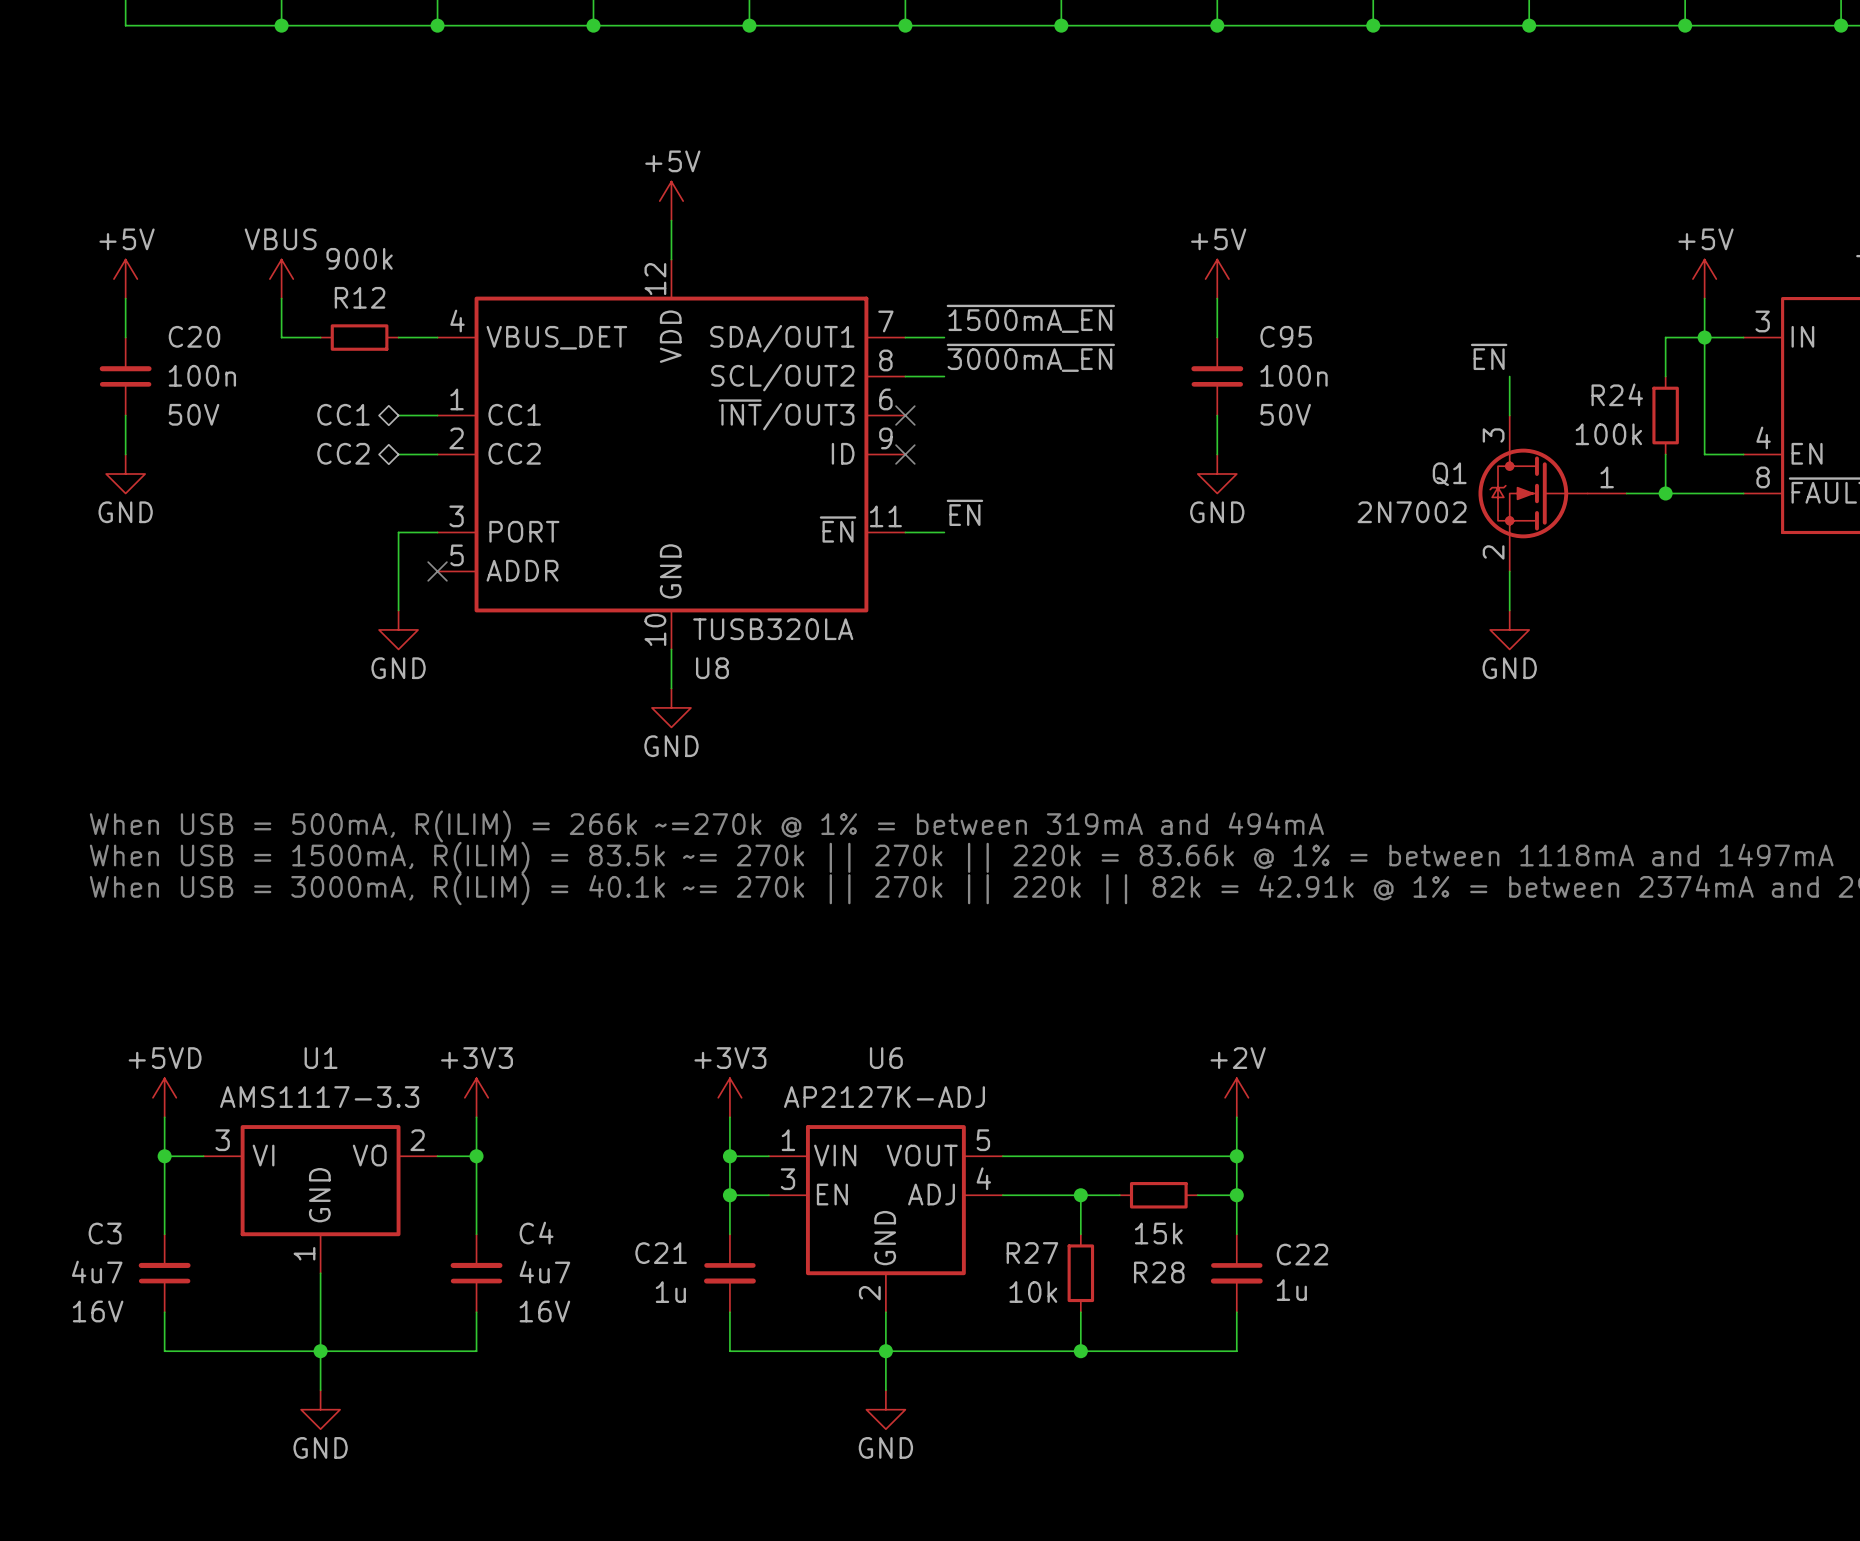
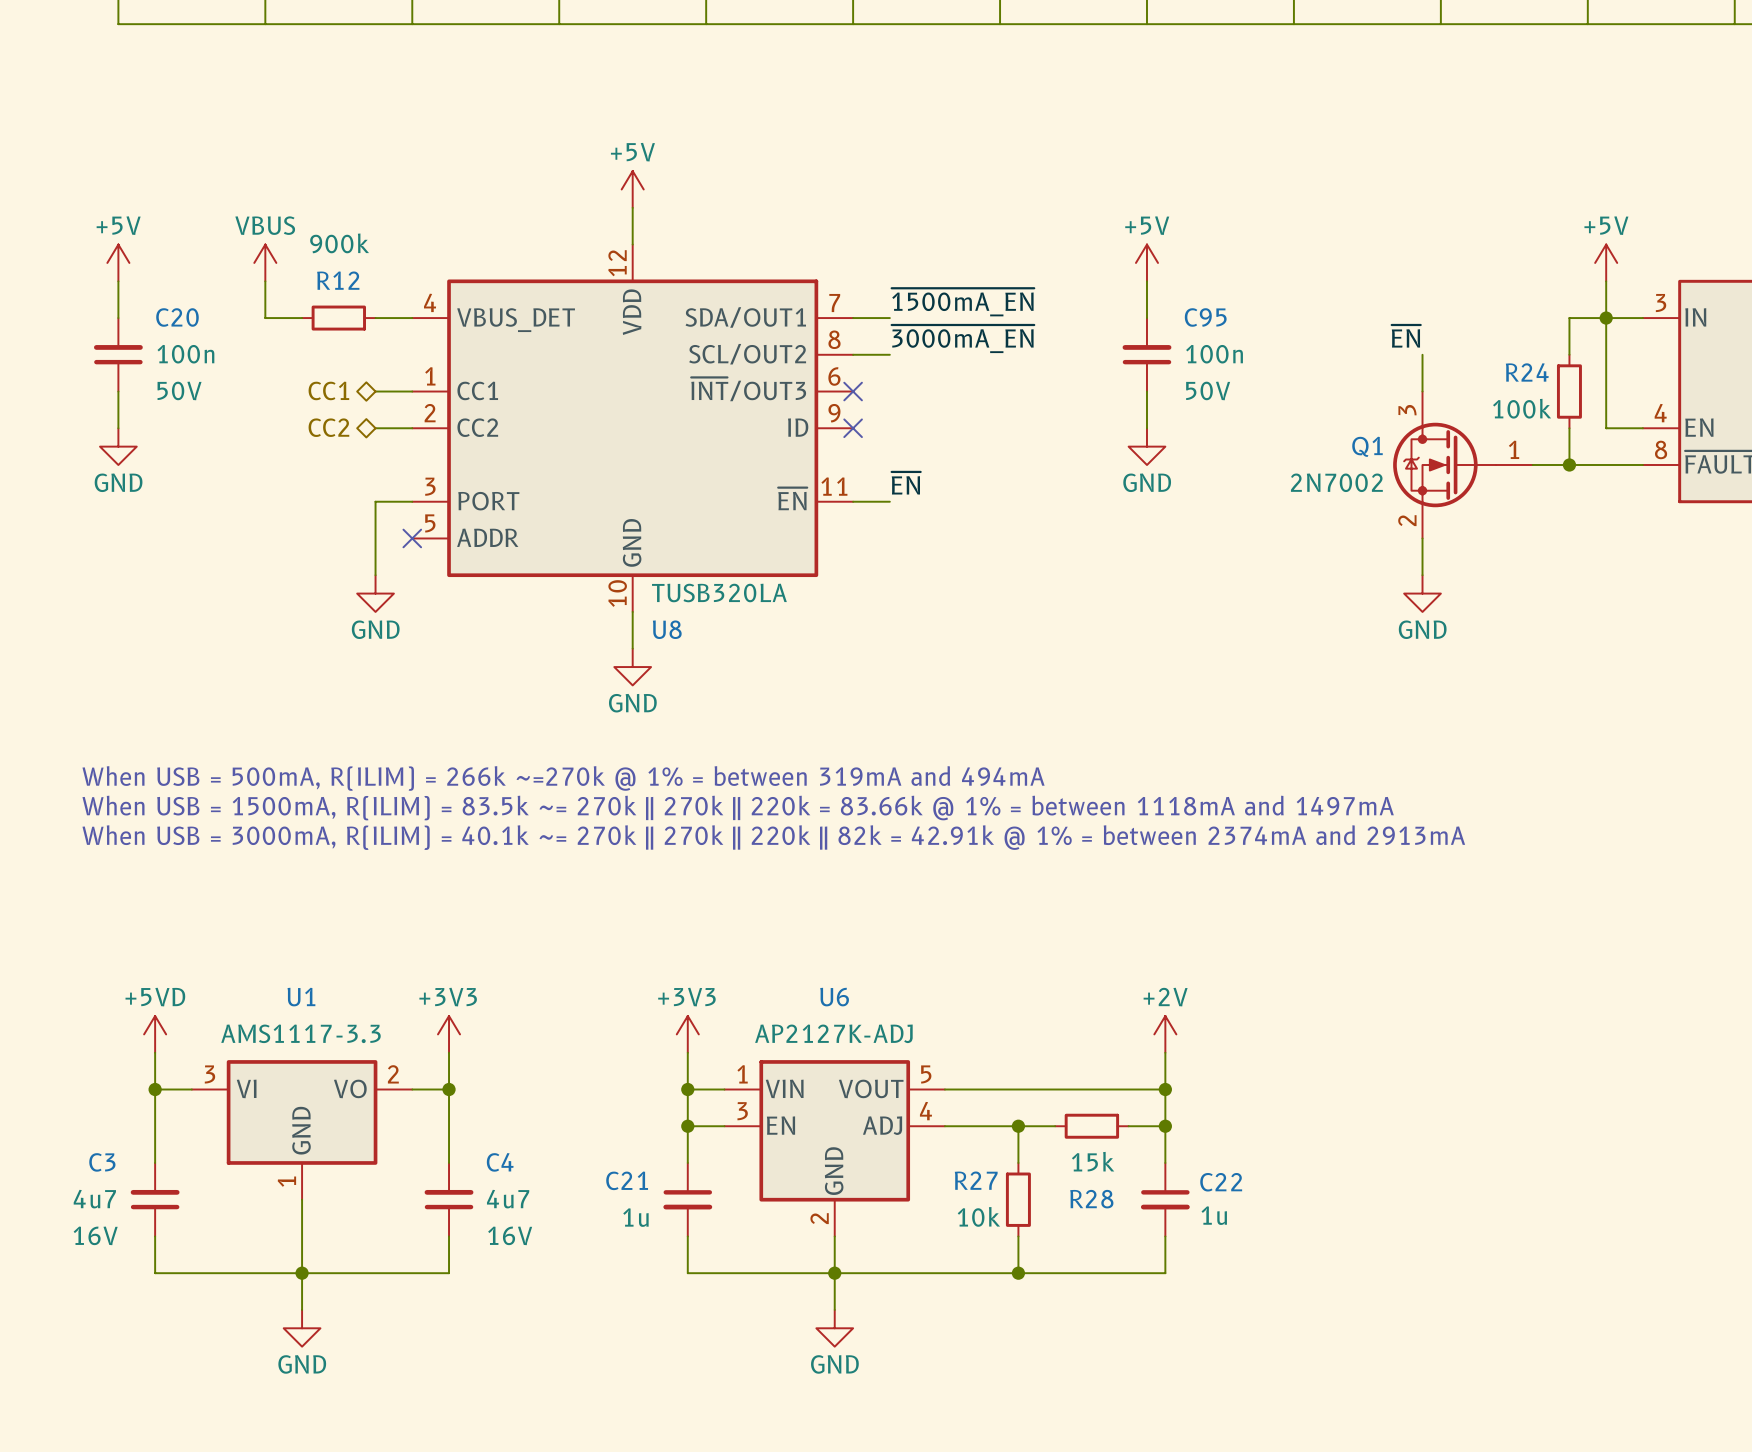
junction: (281, 25) -> none
junction: (437, 25) -> none
junction: (593, 25) -> none
junction: (749, 25) -> none
junction: (905, 25) -> none
junction: (1061, 25) -> none
junction: (1217, 25) -> none
junction: (1373, 25) -> none
junction: (1529, 25) -> none
junction: (1685, 25) -> none
junction: (1841, 25) -> none

